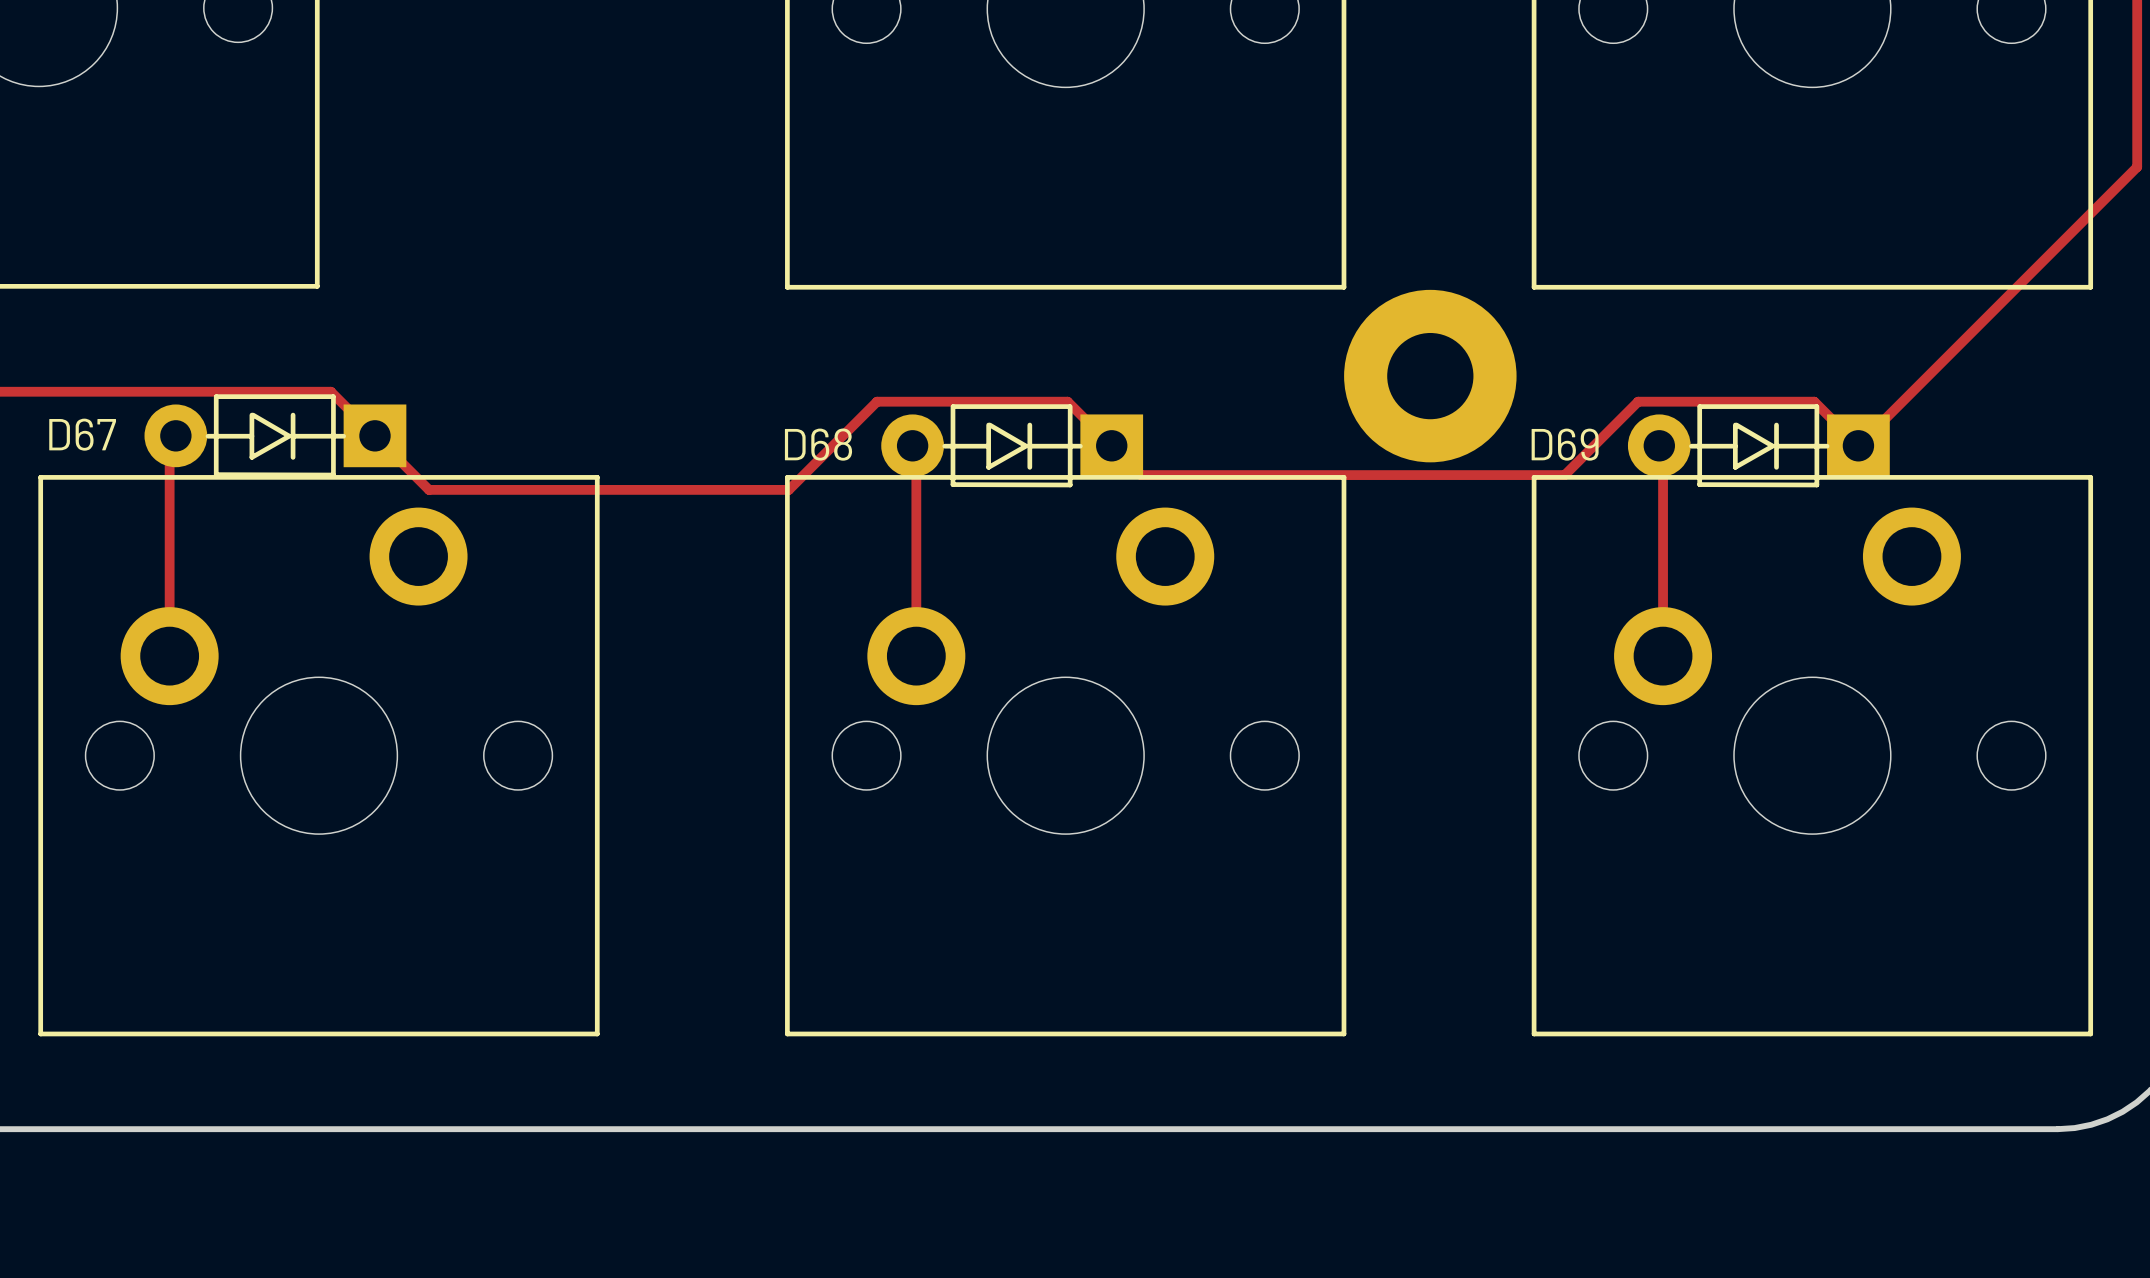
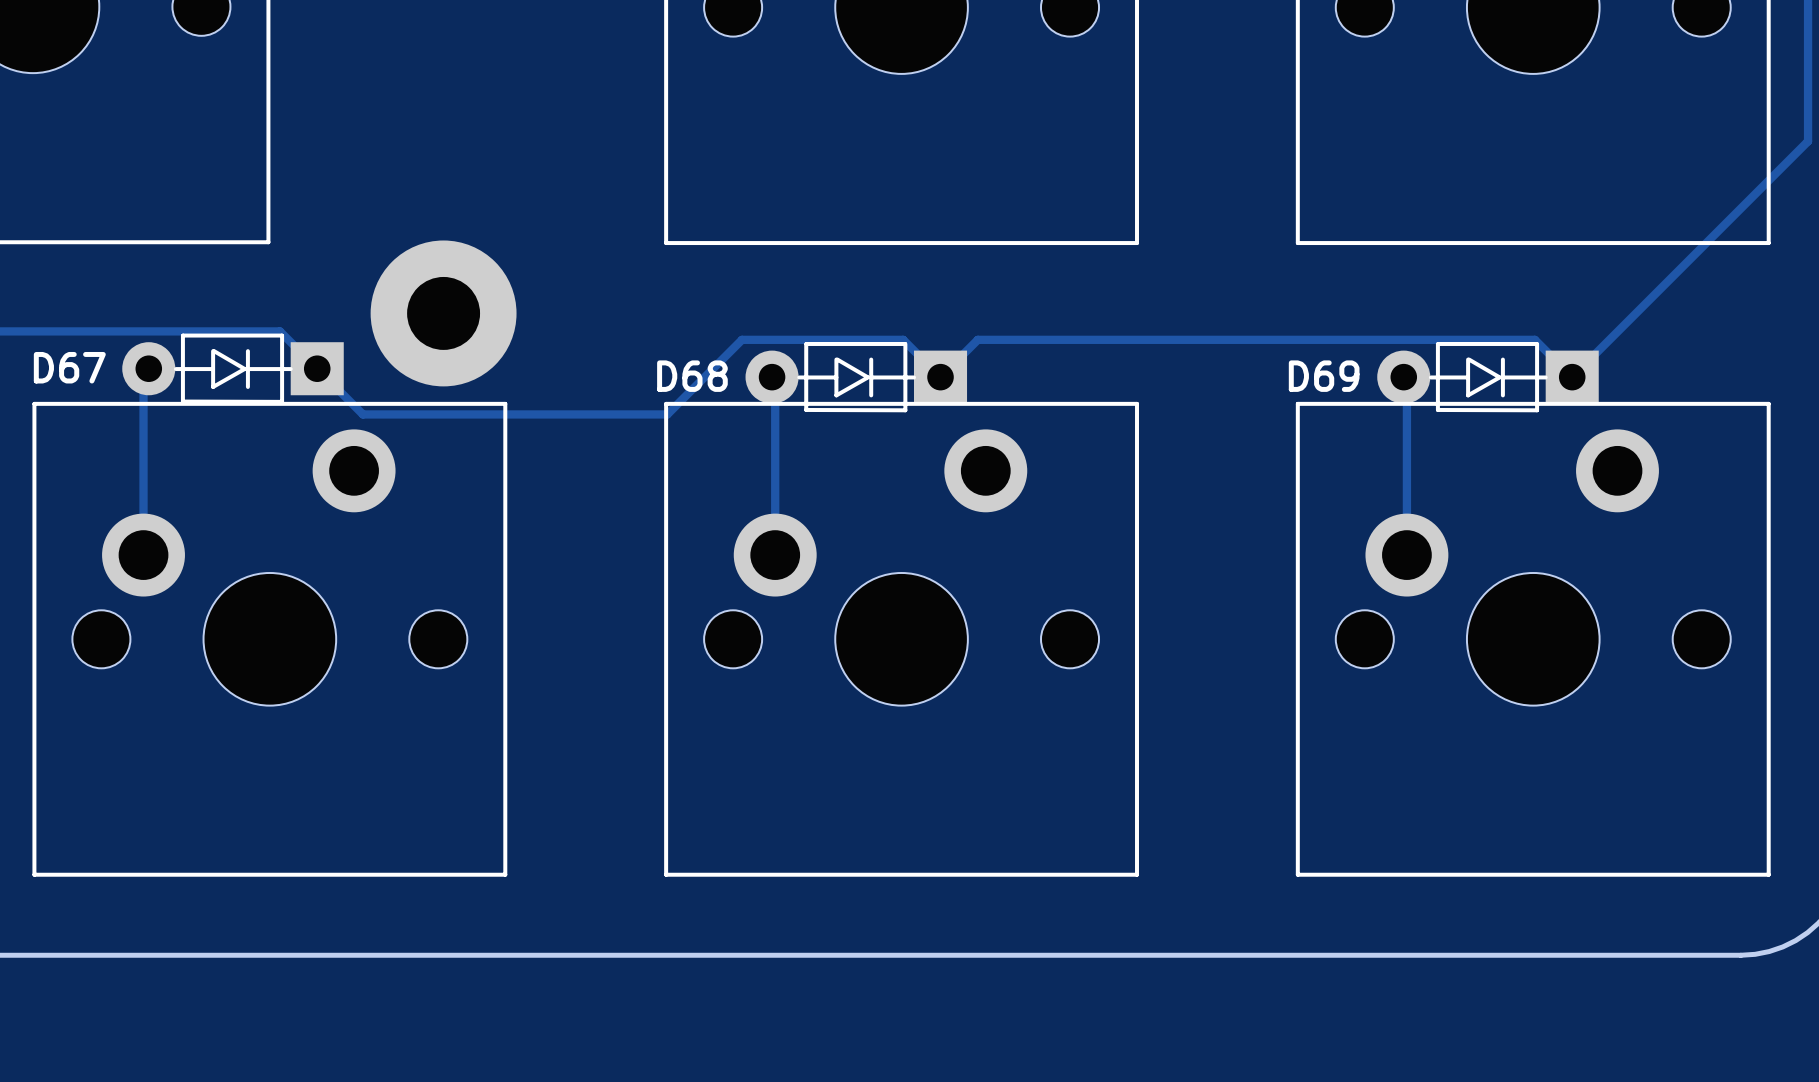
part position: (1430, 376) -> (443, 313)
track: (1638, 401) (1564, 475) (1141, 475) (1111, 445) -> (1385, 339) (977, 339) (940, 377)

